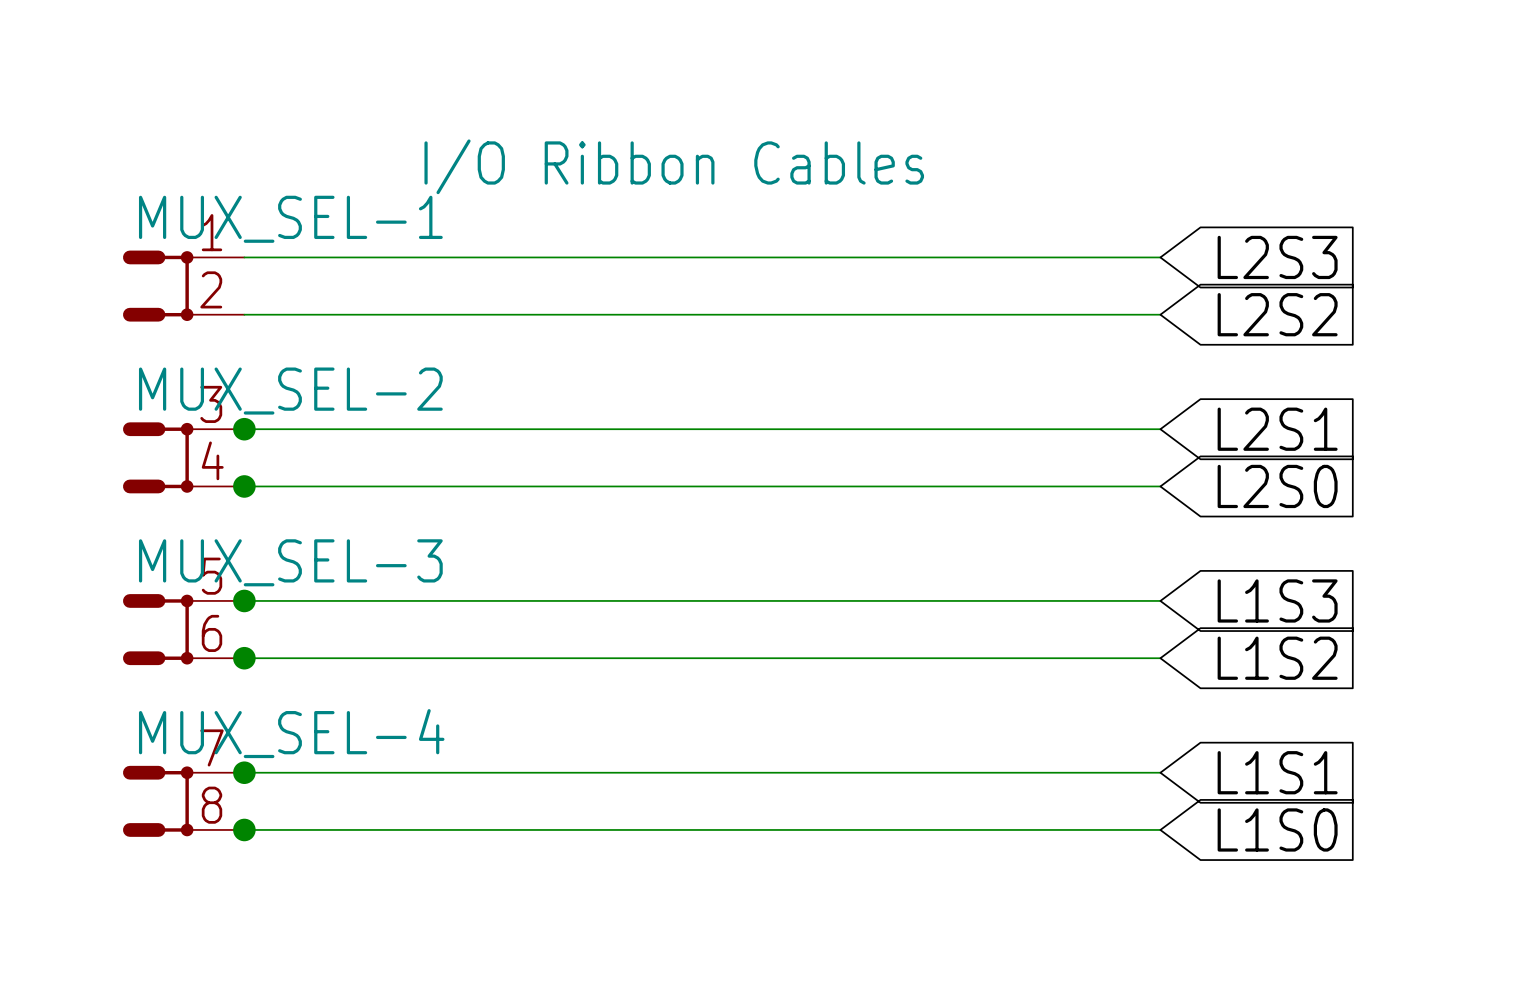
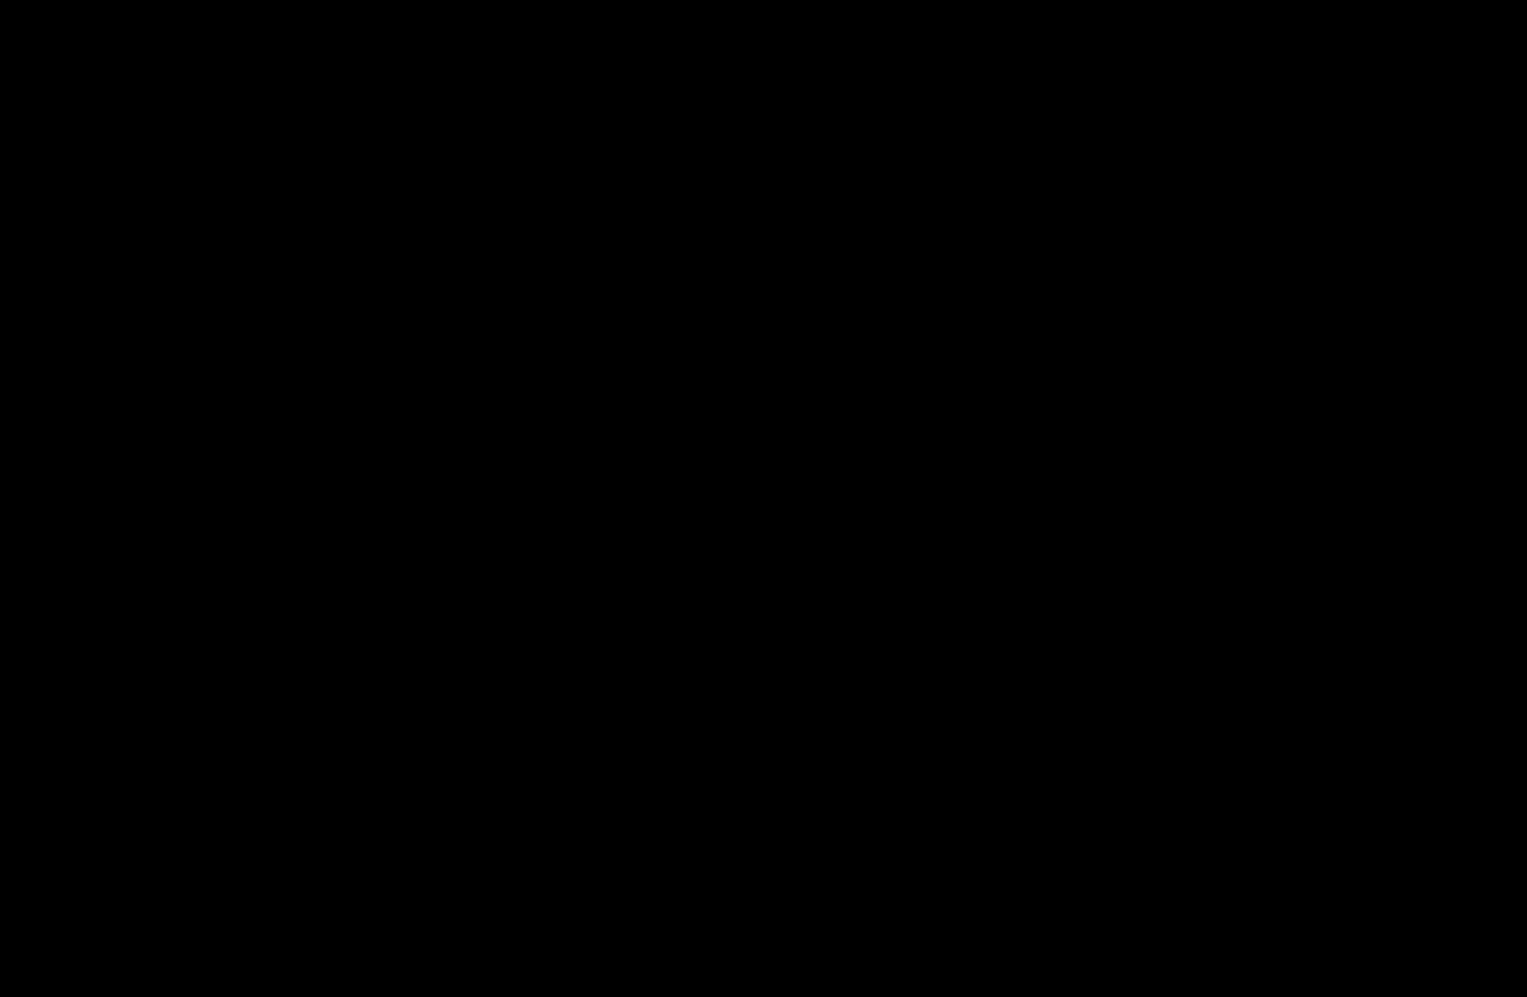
text: I/O Ribbon Cables (674, 166) -> none
wire: (244, 257) (1160, 257) -> none
global label: L2S3 (1277, 257) -> none
MUX_SEL-1: (183, 286) -> none
wire: (244, 314) (1160, 314) -> none
global label: L2S2 (1277, 314) -> none
wire: (244, 429) (1160, 429) -> none
junction: (244, 429) -> none
global label: L2S1 (1277, 429) -> none
MUX_SEL-2: (183, 457) -> none
wire: (244, 486) (1160, 486) -> none
junction: (244, 486) -> none
global label: L2S0 (1277, 486) -> none
wire: (244, 600) (1160, 600) -> none
junction: (244, 600) -> none
global label: L1S3 (1277, 600) -> none
MUX_SEL-3: (183, 629) -> none
wire: (244, 658) (1160, 658) -> none
junction: (244, 658) -> none
global label: L1S2 (1277, 658) -> none
wire: (244, 772) (1160, 772) -> none
junction: (244, 772) -> none
global label: L1S1 (1277, 772) -> none
MUX_SEL-4: (183, 801) -> none
wire: (244, 829) (1160, 829) -> none
junction: (244, 829) -> none
global label: L1S0 (1277, 829) -> none

